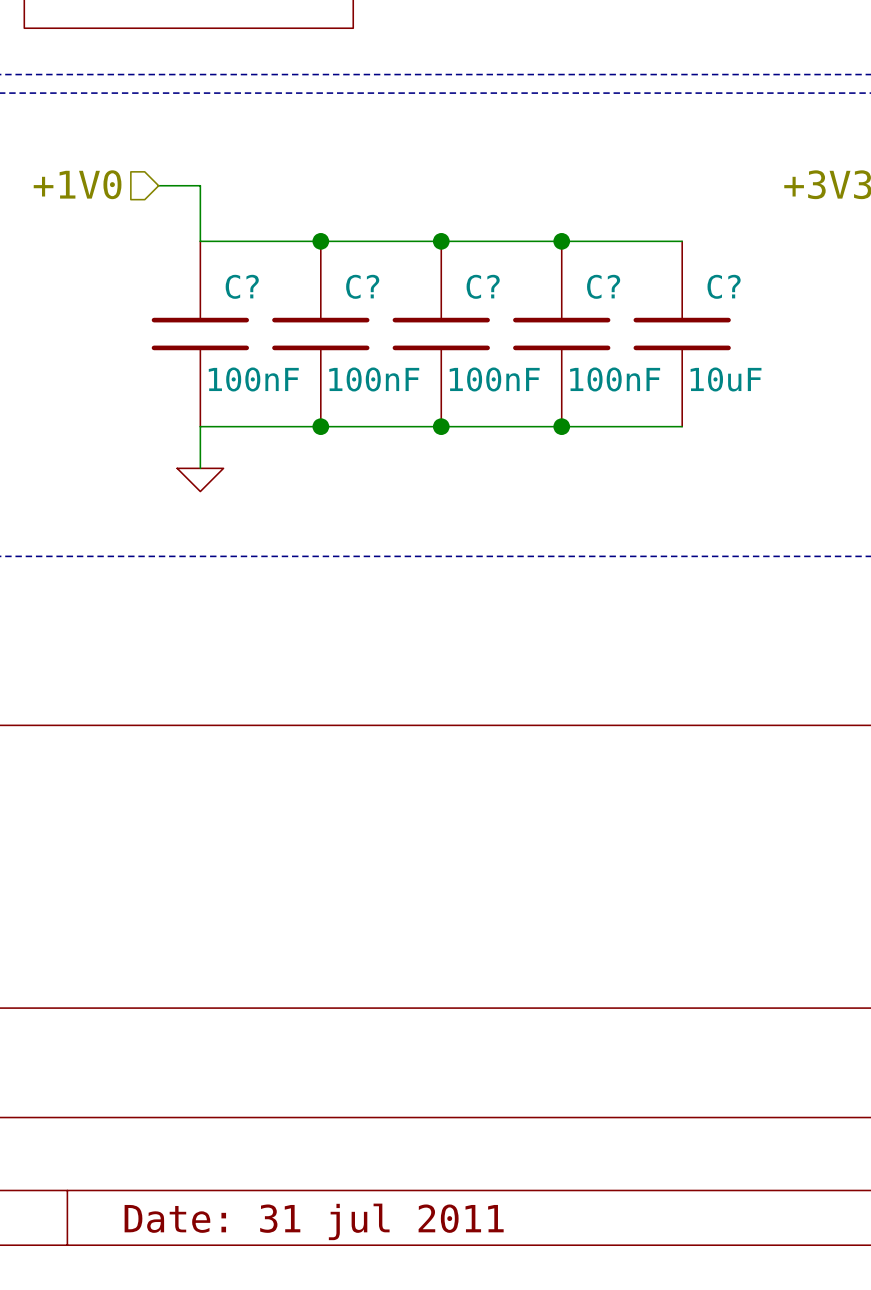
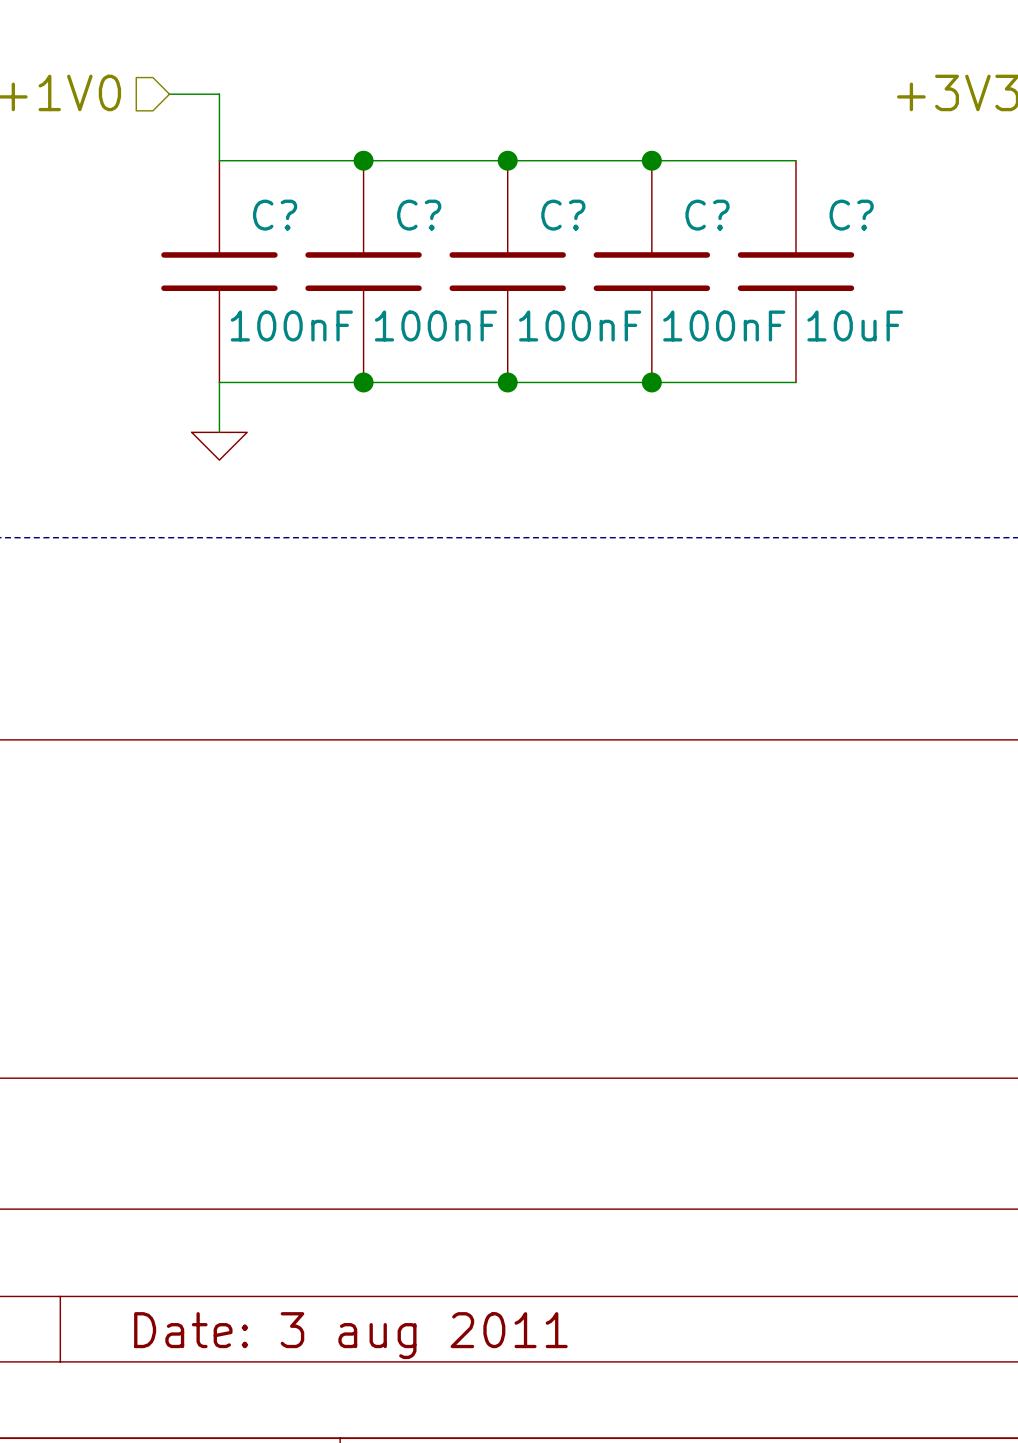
title block: Date: 31 jul 2011 (314, 1221) -> Date: 3 aug 2011 (350, 1335)

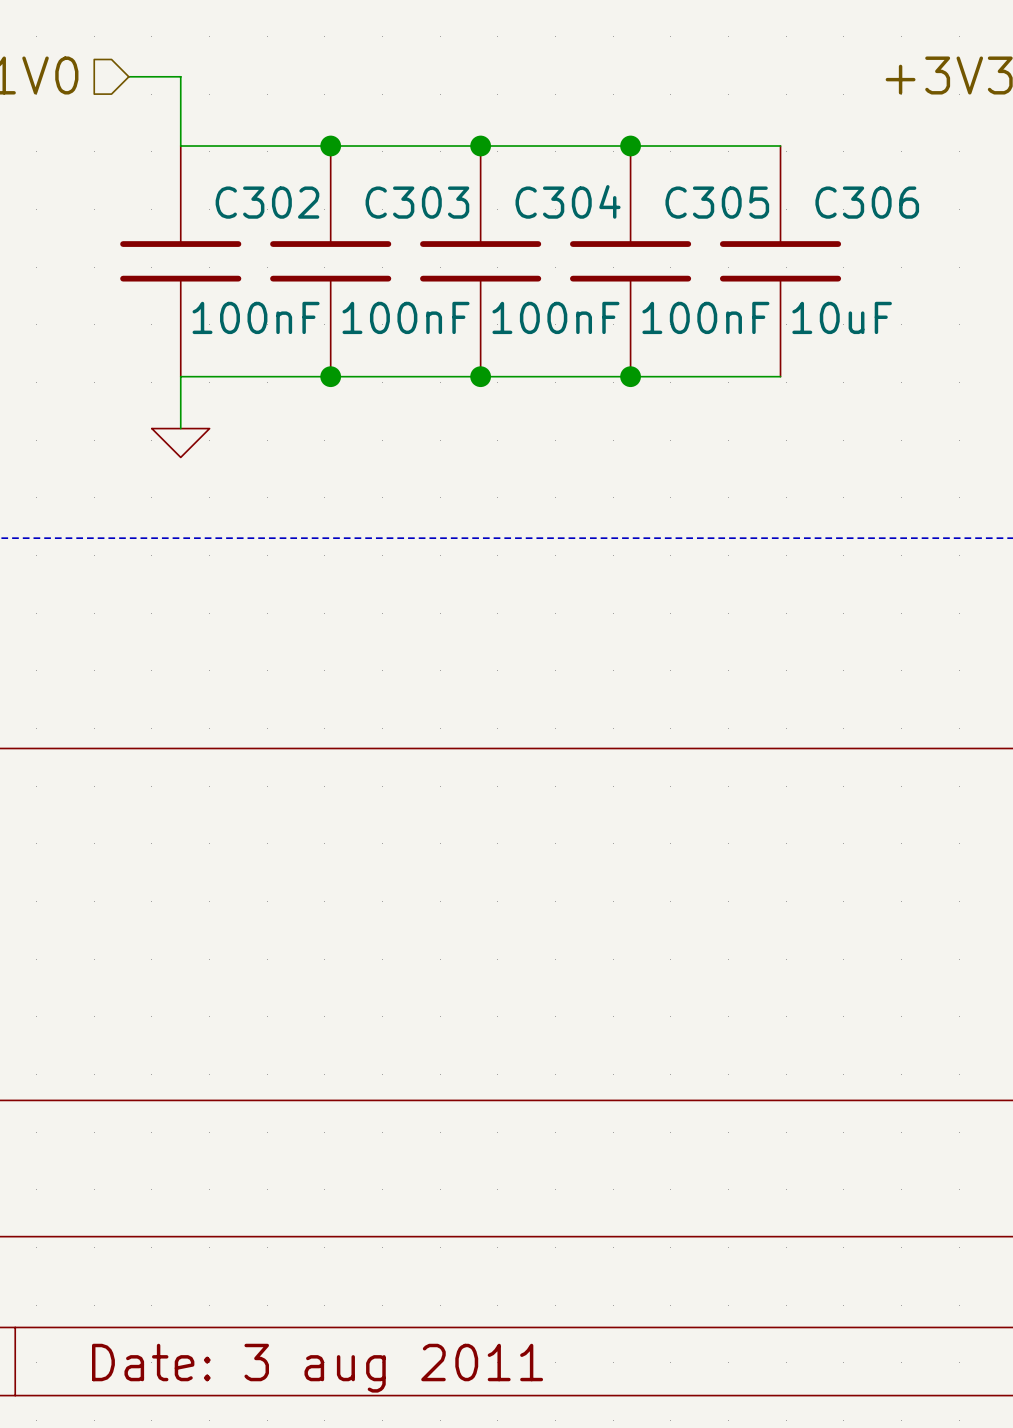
C? name: C? (275, 215) -> C302 (267, 202)
C? name: C? (419, 215) -> C303 (417, 202)
C? name: C? (563, 215) -> C304 (568, 201)
C? name: C? (707, 215) -> C305 (717, 202)
C? name: C? (851, 215) -> C306 (867, 202)

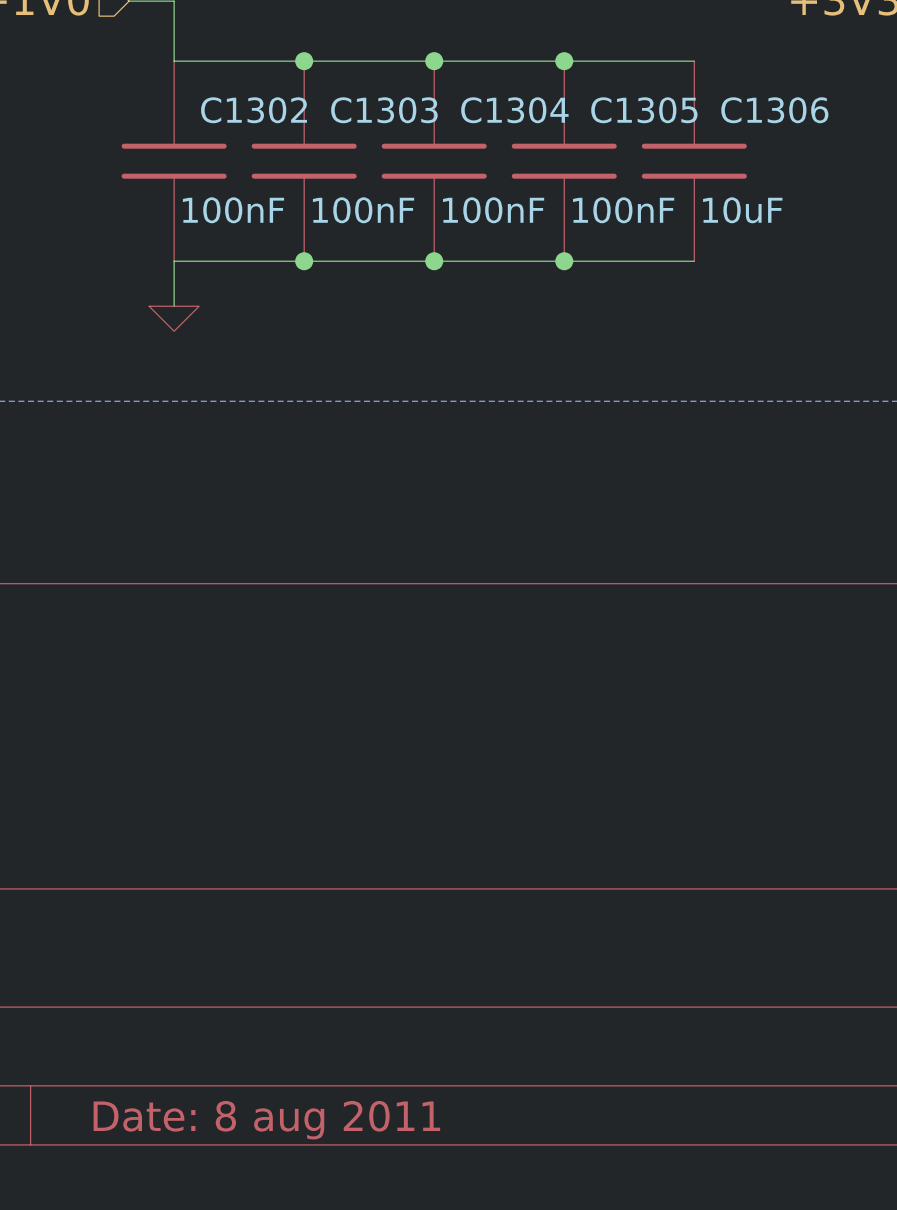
C304 name: C304 (568, 201) -> C1304 (514, 110)
C302 name: C302 (267, 202) -> C1302 (254, 110)
C303 name: C303 (417, 202) -> C1303 (384, 110)
C305 name: C305 (717, 202) -> C1305 (644, 110)
C306 name: C306 (867, 202) -> C1306 (774, 110)
title block: Date: 3 aug 2011 (317, 1368) -> Date: 8 aug 2011 (266, 1120)

